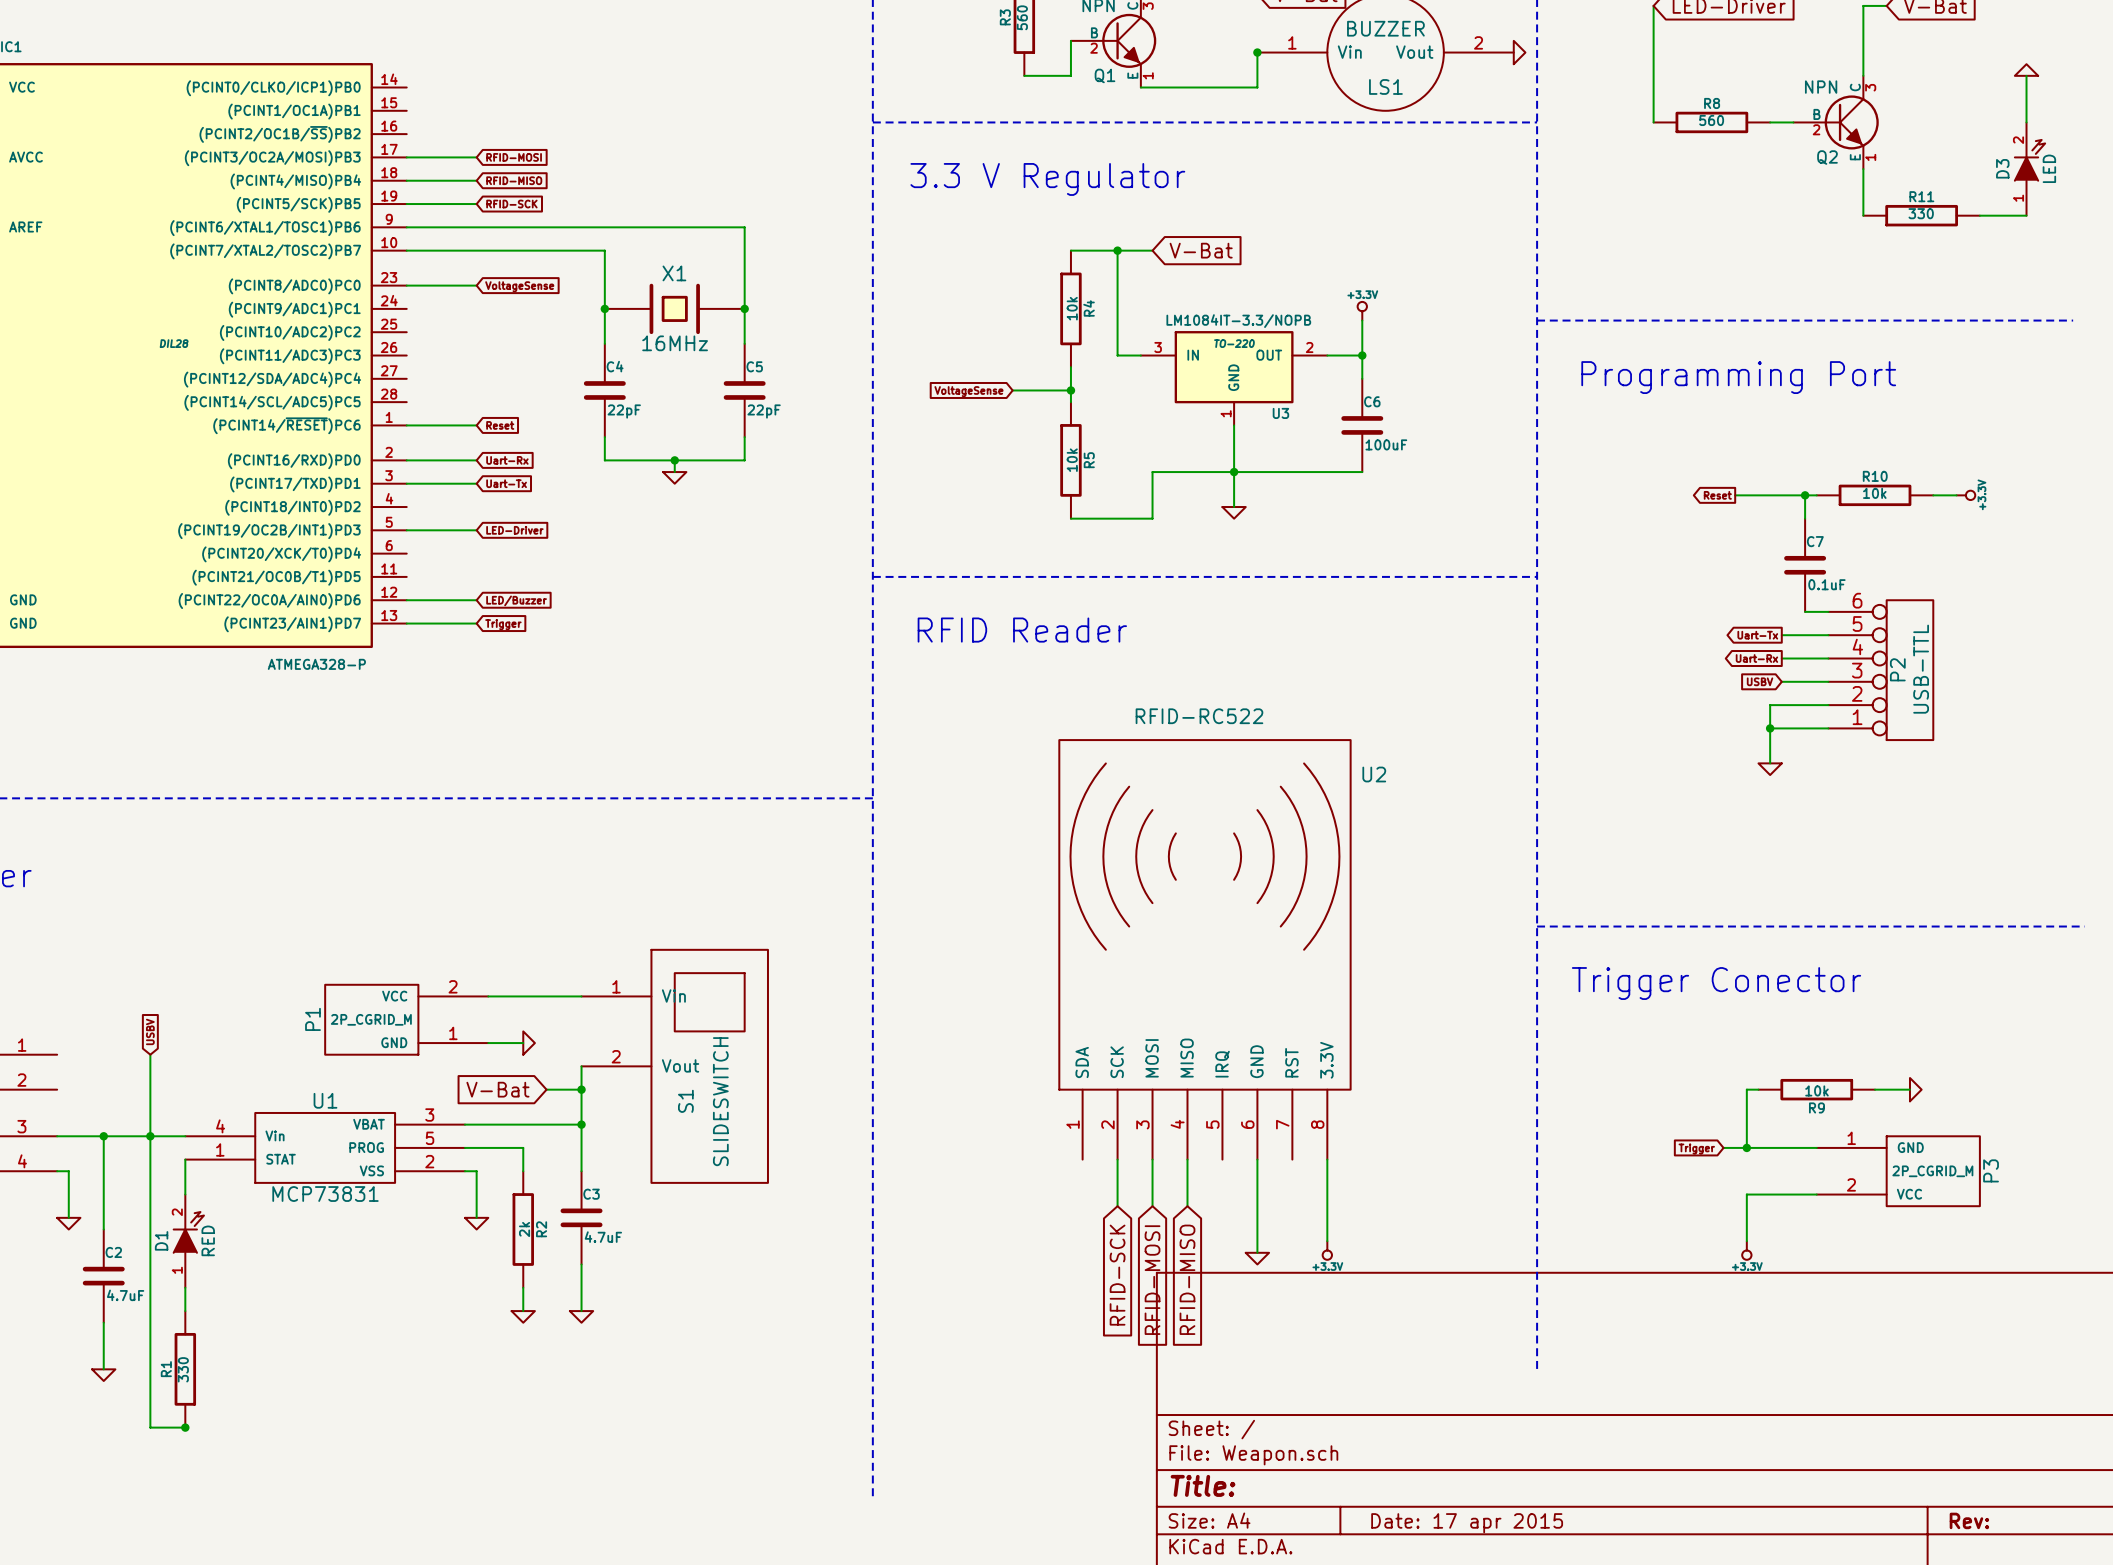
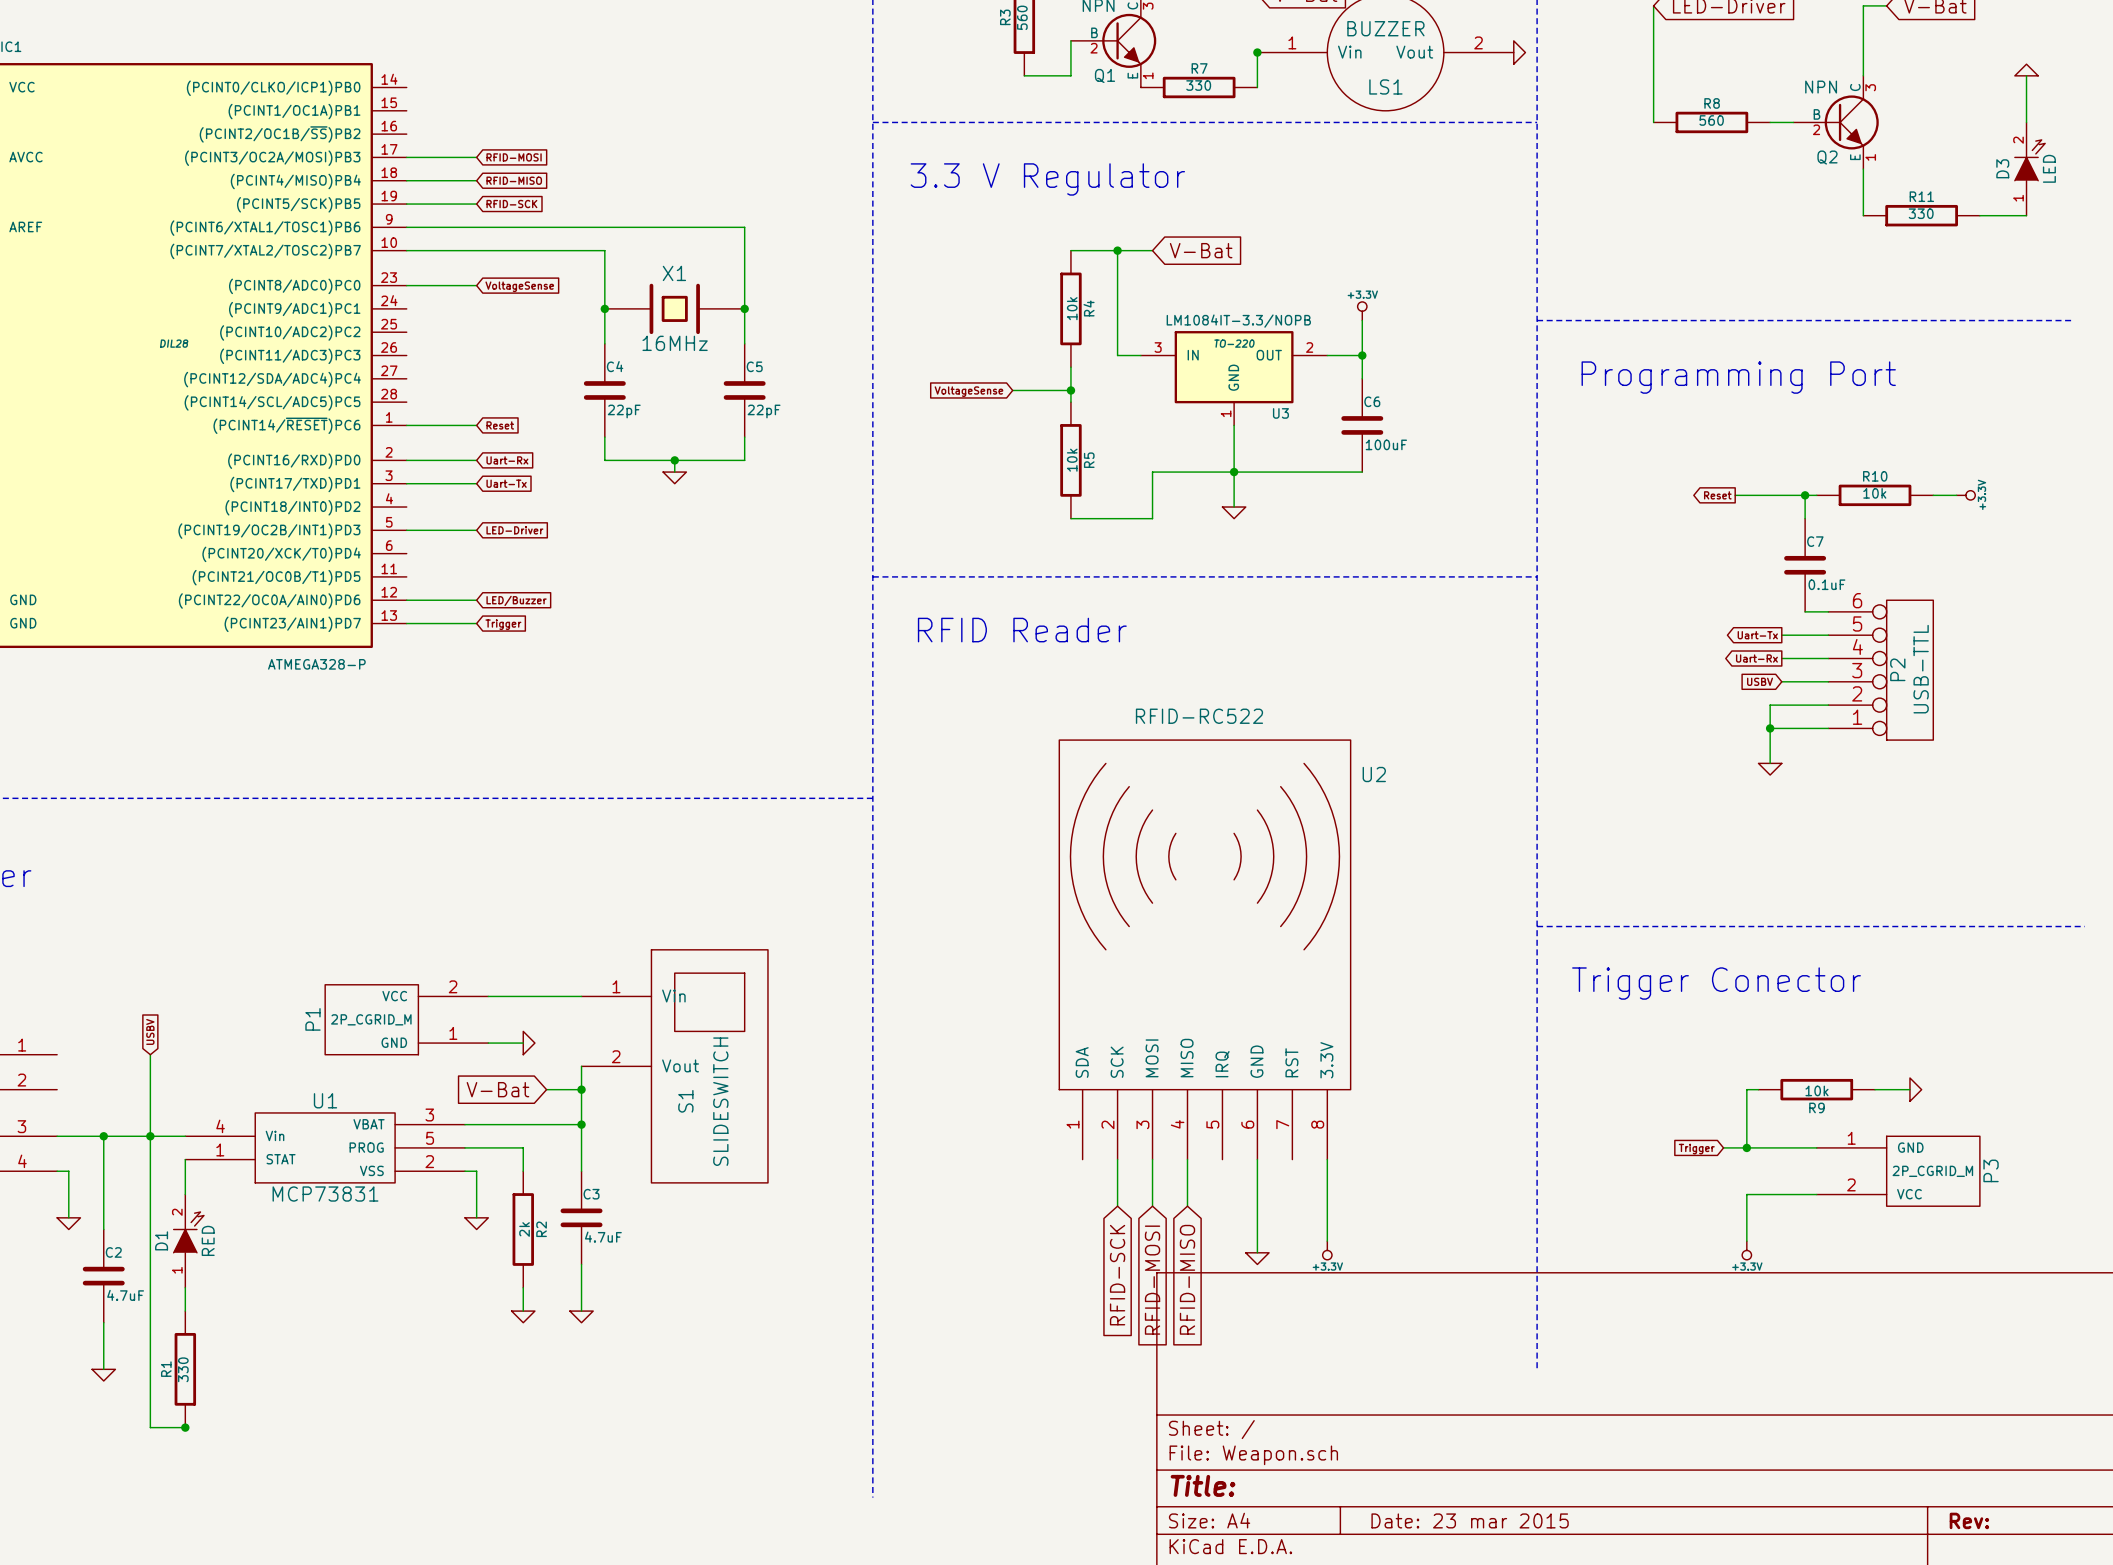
wire: (1140, 87) (1257, 87) -> none
R7: none -> 330 (1199, 87)
title block: Date: 17 apr 2015 (1467, 1523) -> Date: 23 mar 2015 (1470, 1520)

